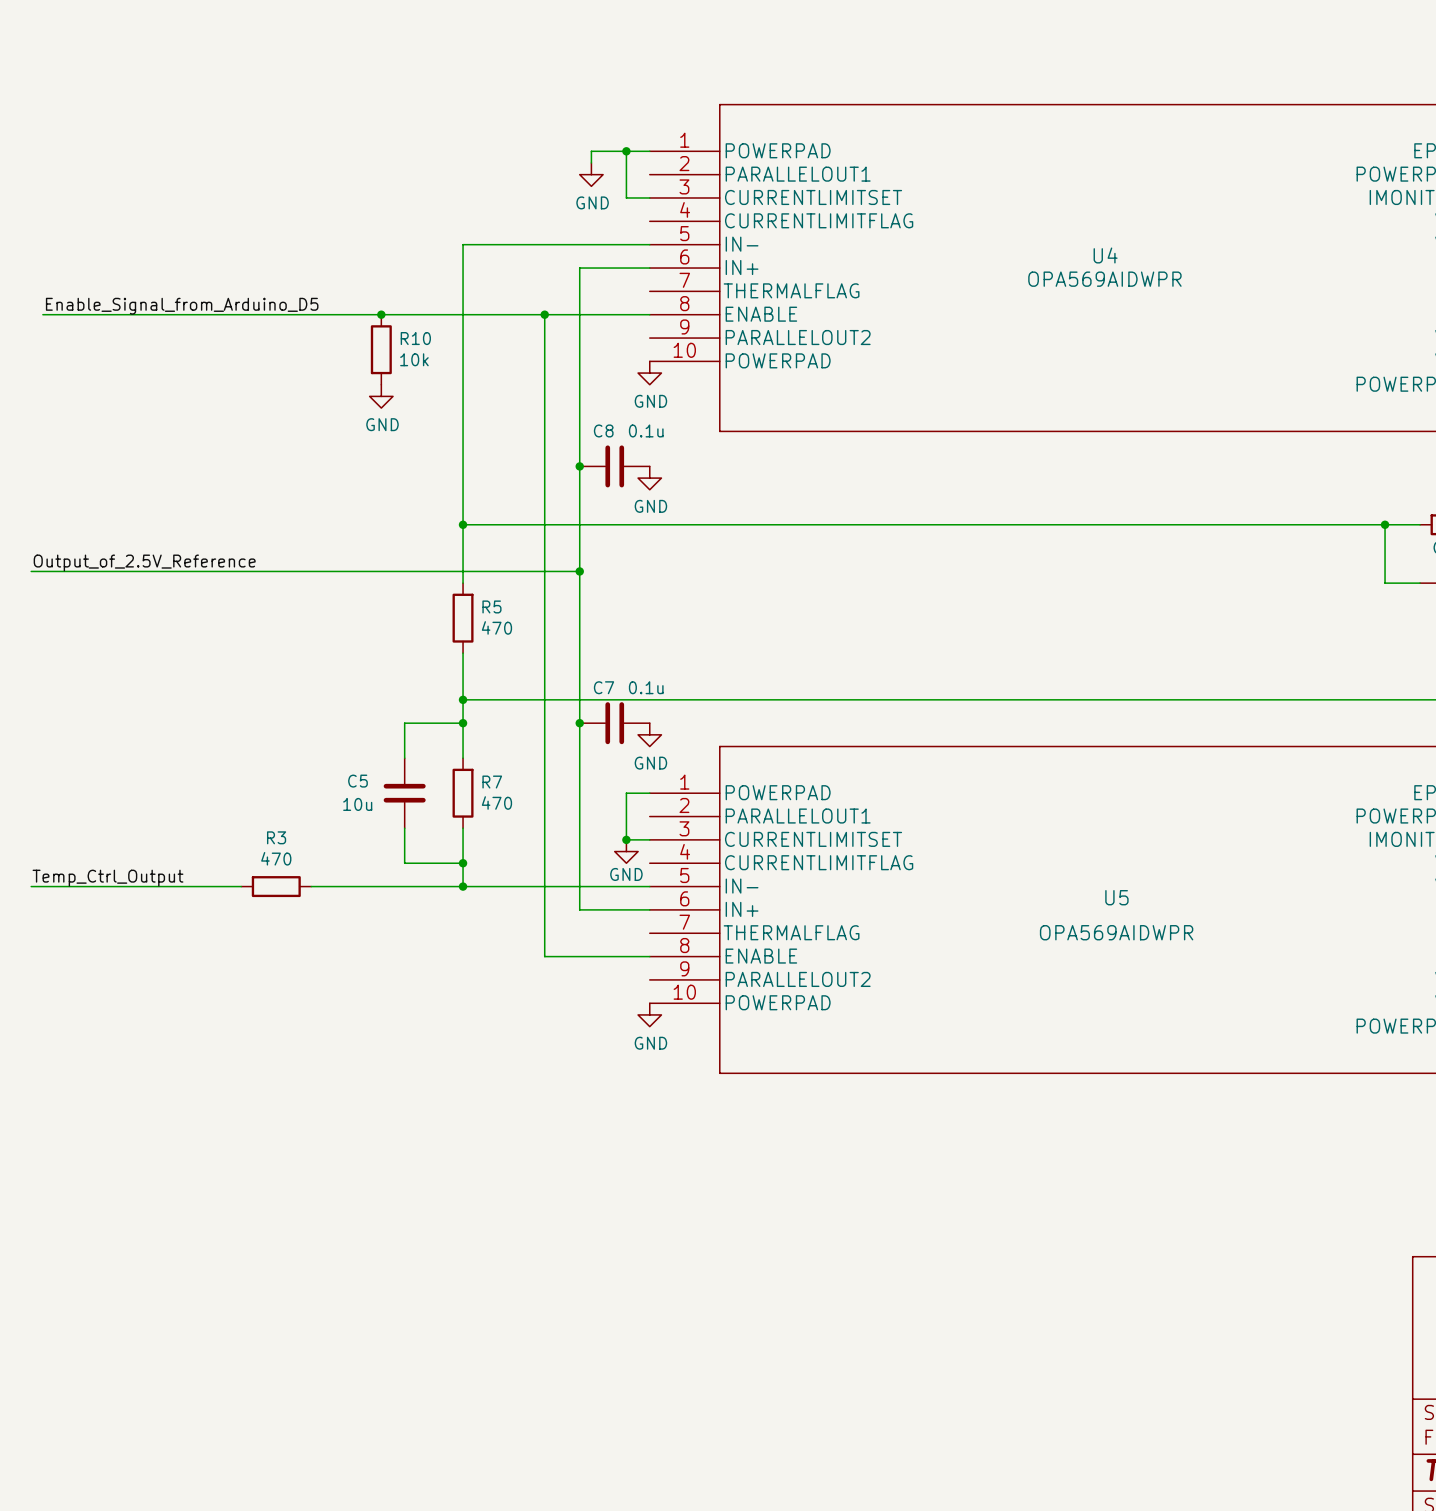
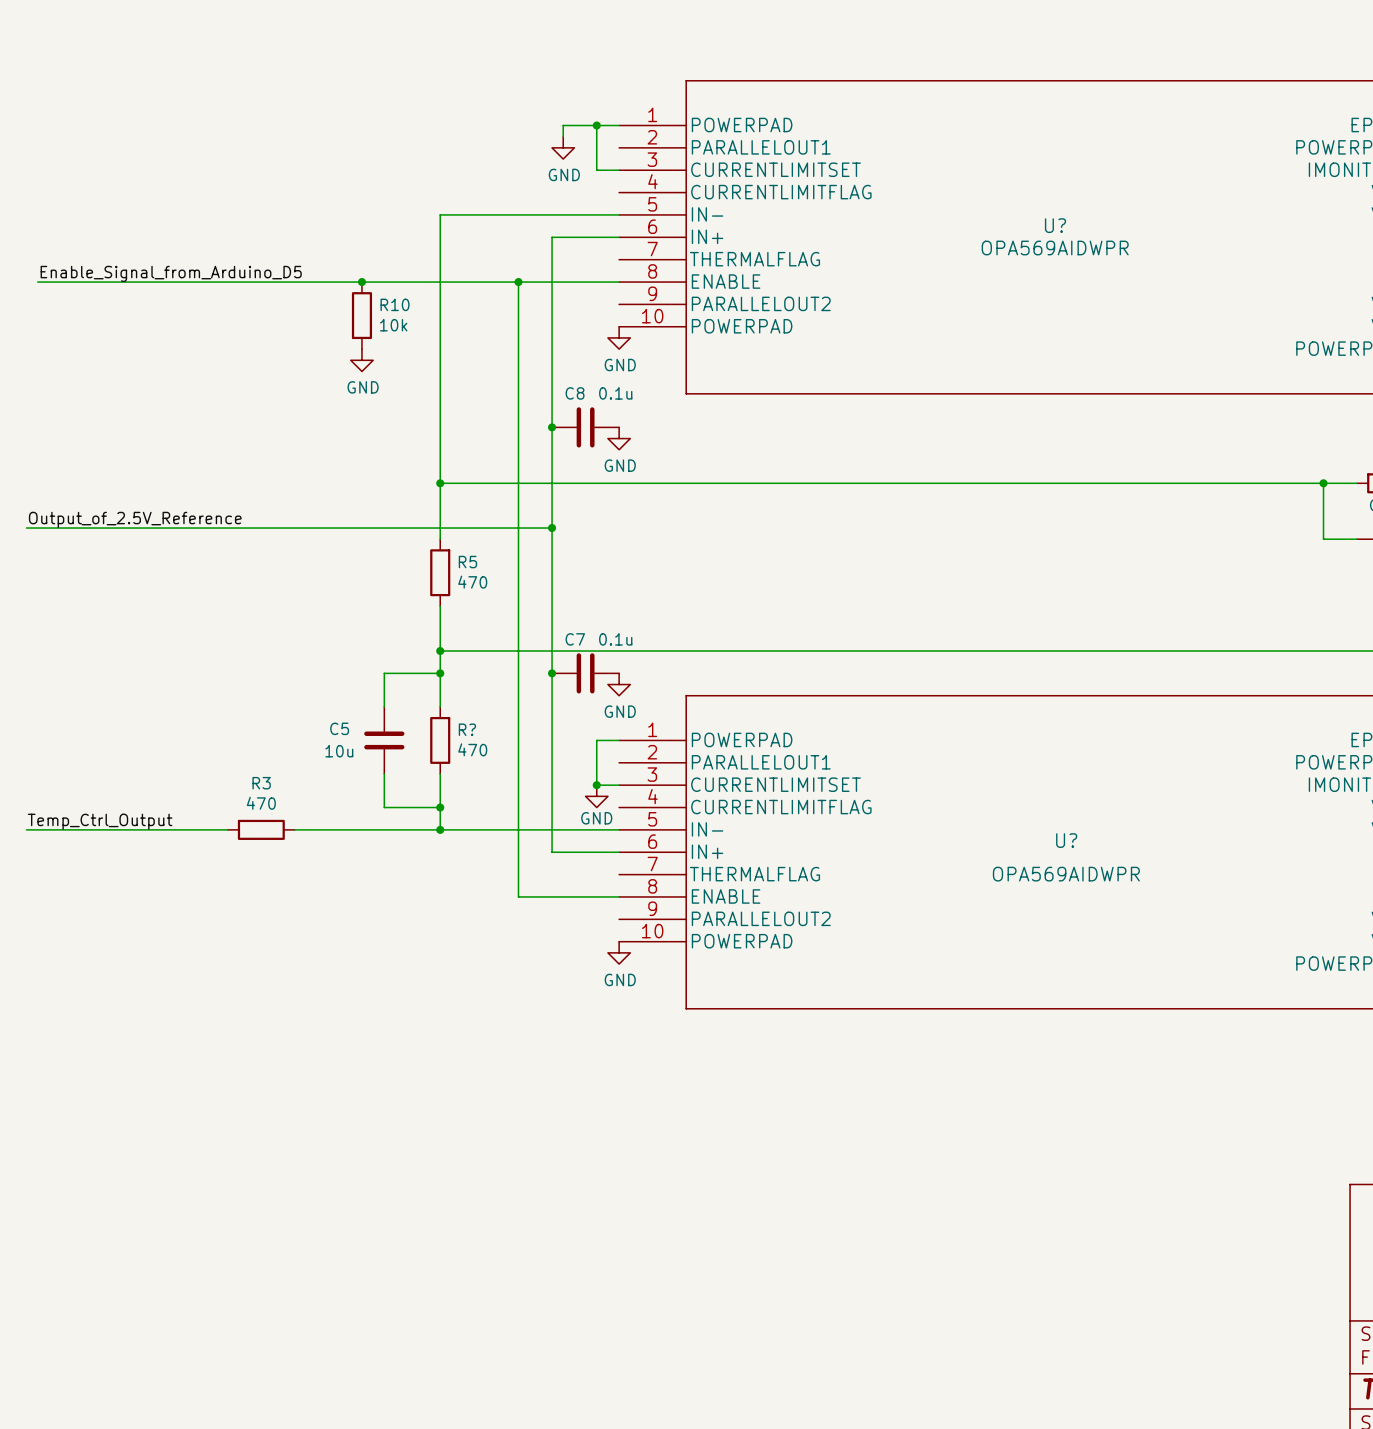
U4 name: U4 (1105, 255) -> U? (1055, 225)
R7 name: R7 (492, 782) -> R? (467, 729)
U5 name: U5 (1116, 897) -> U? (1066, 840)

